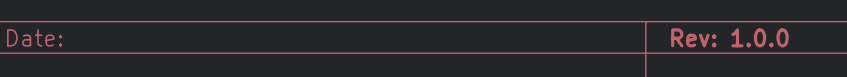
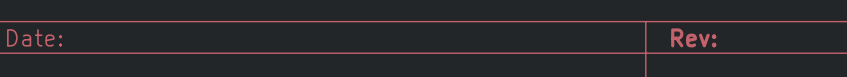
title block: Rev: 1.0.0 (729, 37) -> Rev: (693, 37)

